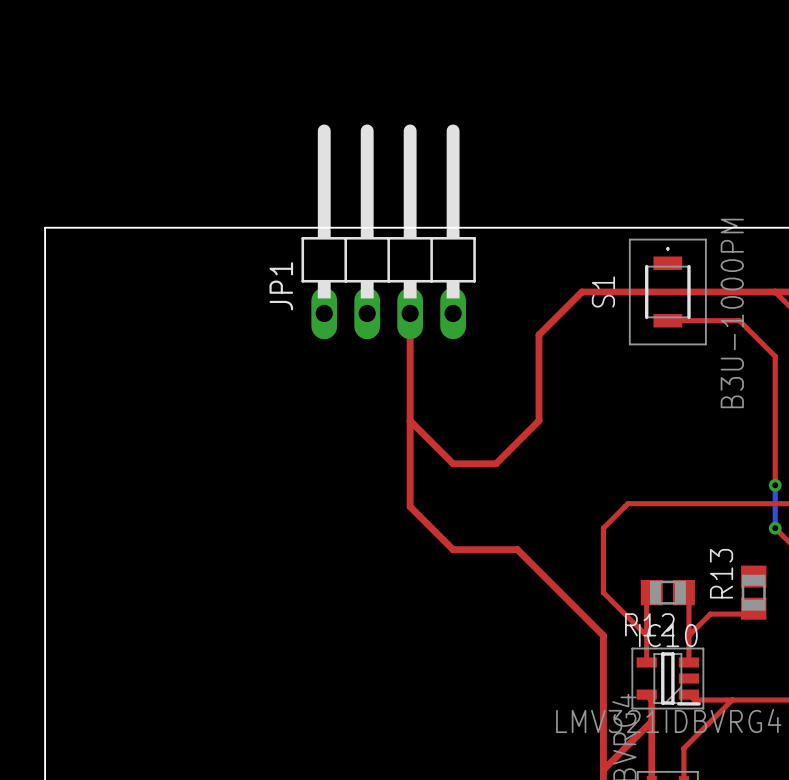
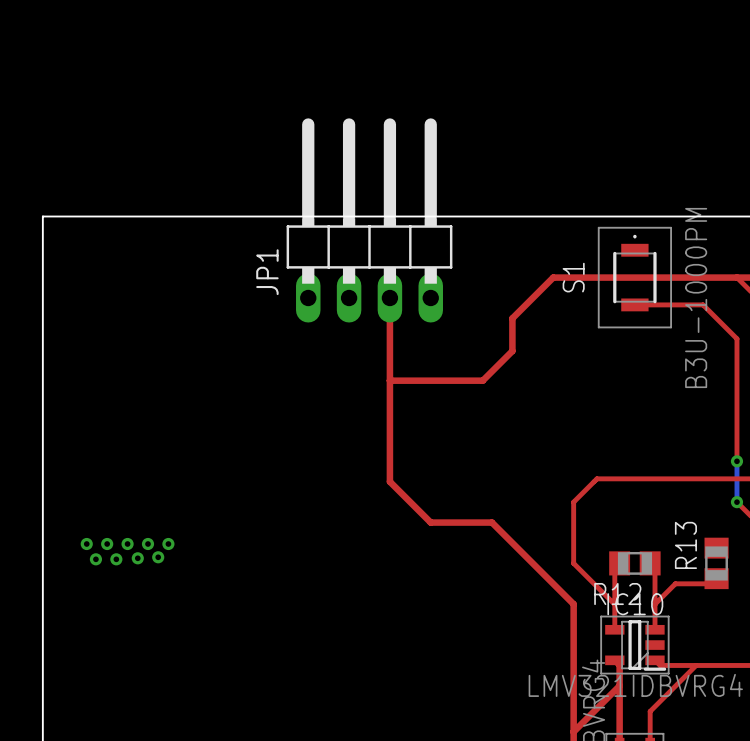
top track: (539, 369) (539, 420) (496, 463) (453, 463) (410, 420) -> (512, 351) (482, 380) (389, 380)
via: none -> (86, 544)
via: none -> (107, 544)
via: none -> (127, 544)
via: none -> (147, 544)
via: none -> (168, 544)
via: none -> (158, 557)
via: none -> (137, 558)
via: none -> (95, 559)
via: none -> (116, 559)

